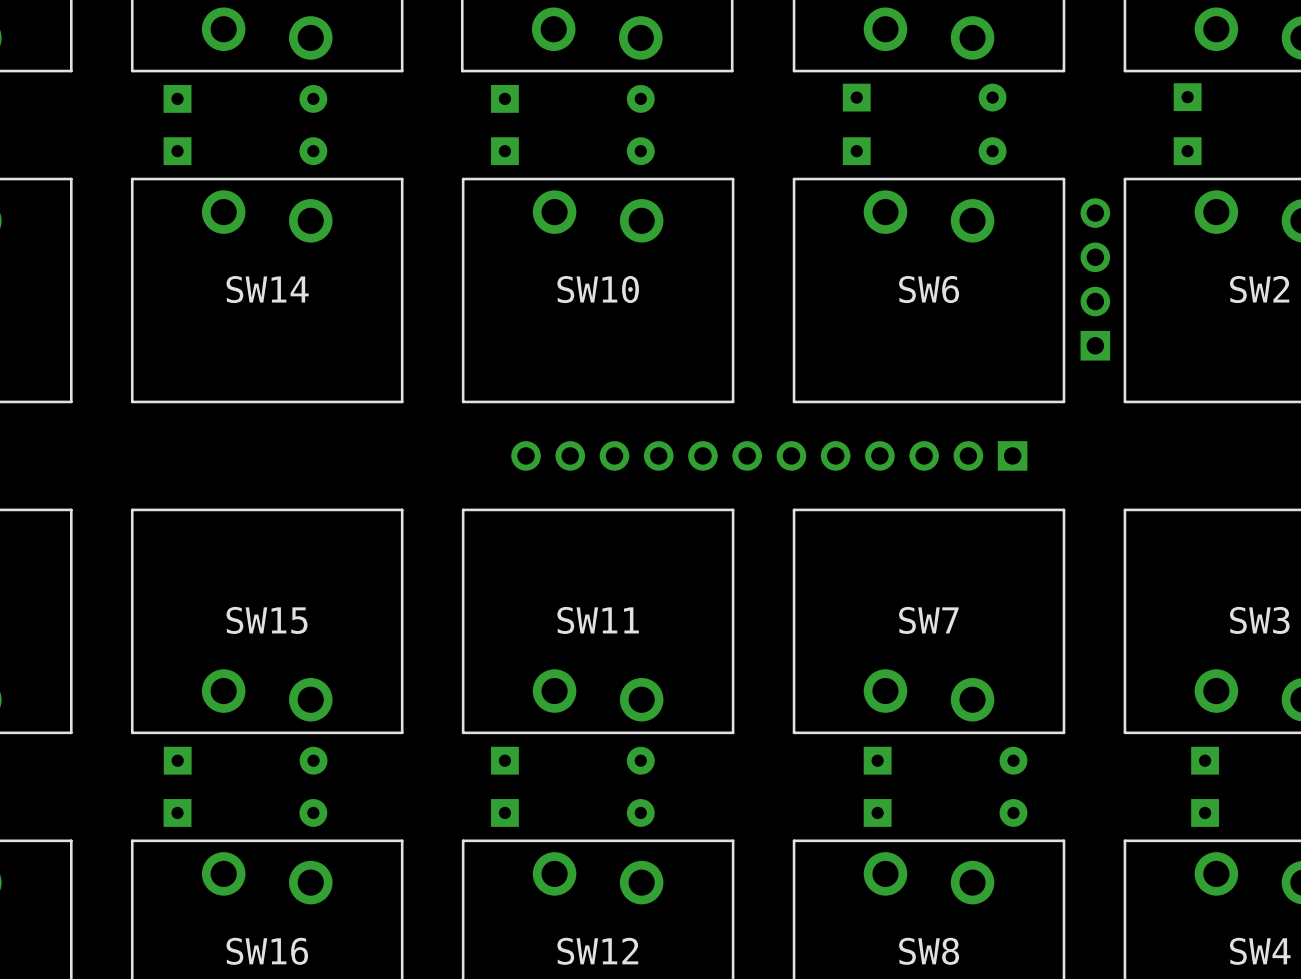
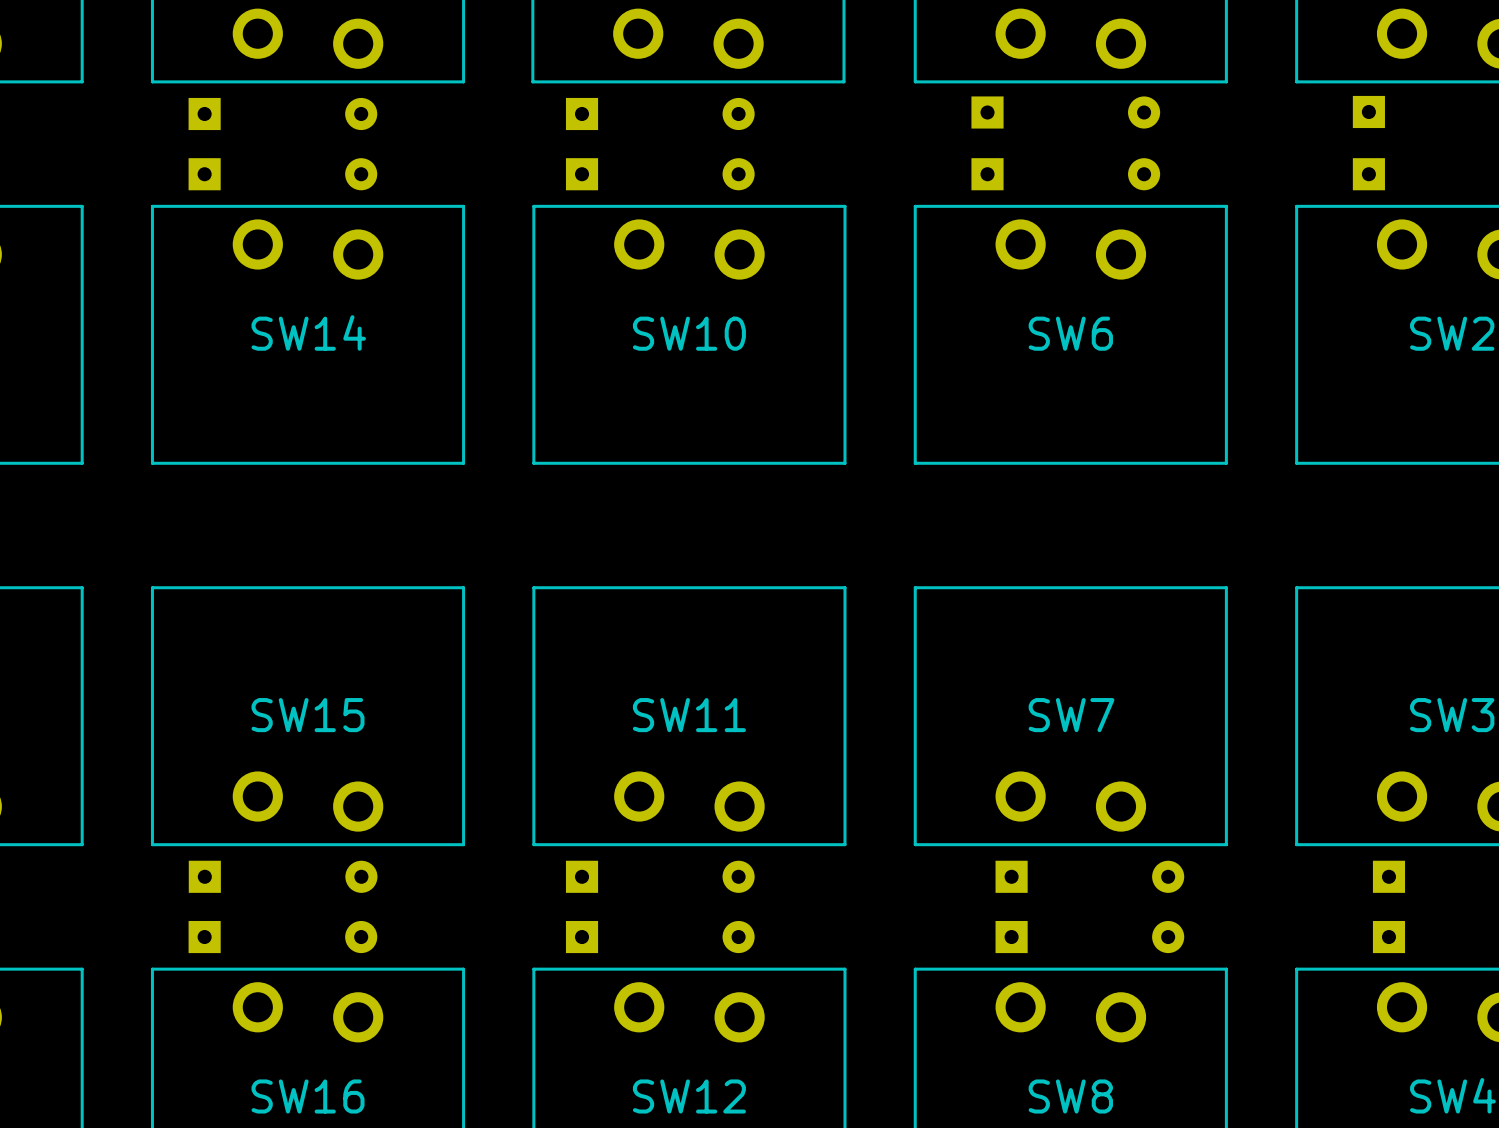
part: (1095, 279) -> none
part: (769, 455) -> none

